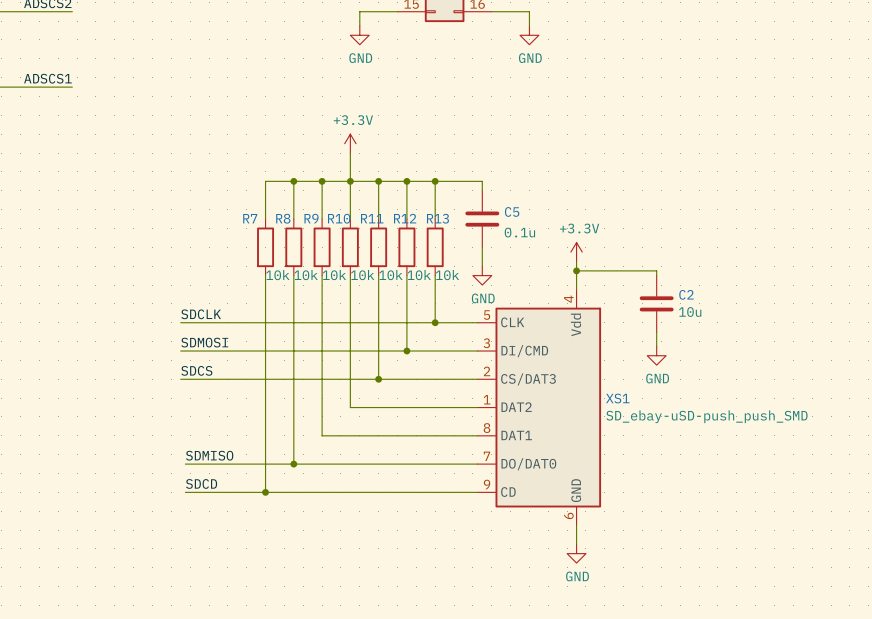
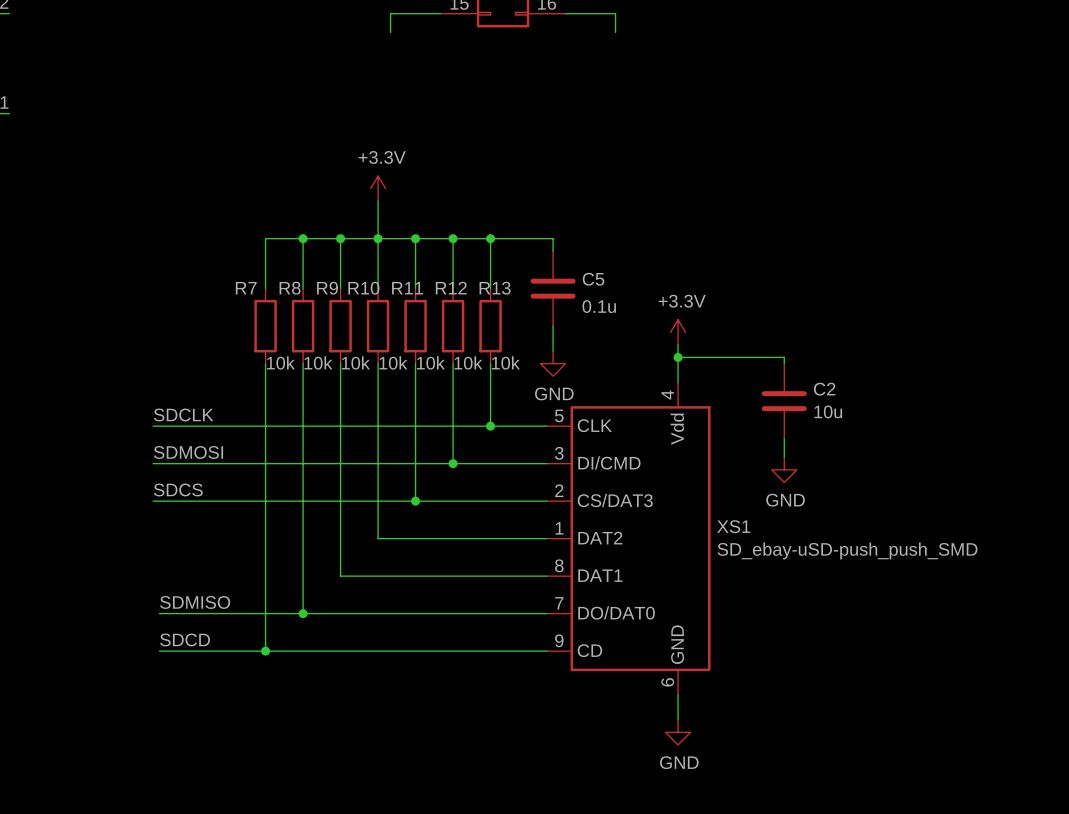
power symbol: GND (359, 35) -> none
power symbol: GND (529, 35) -> none

